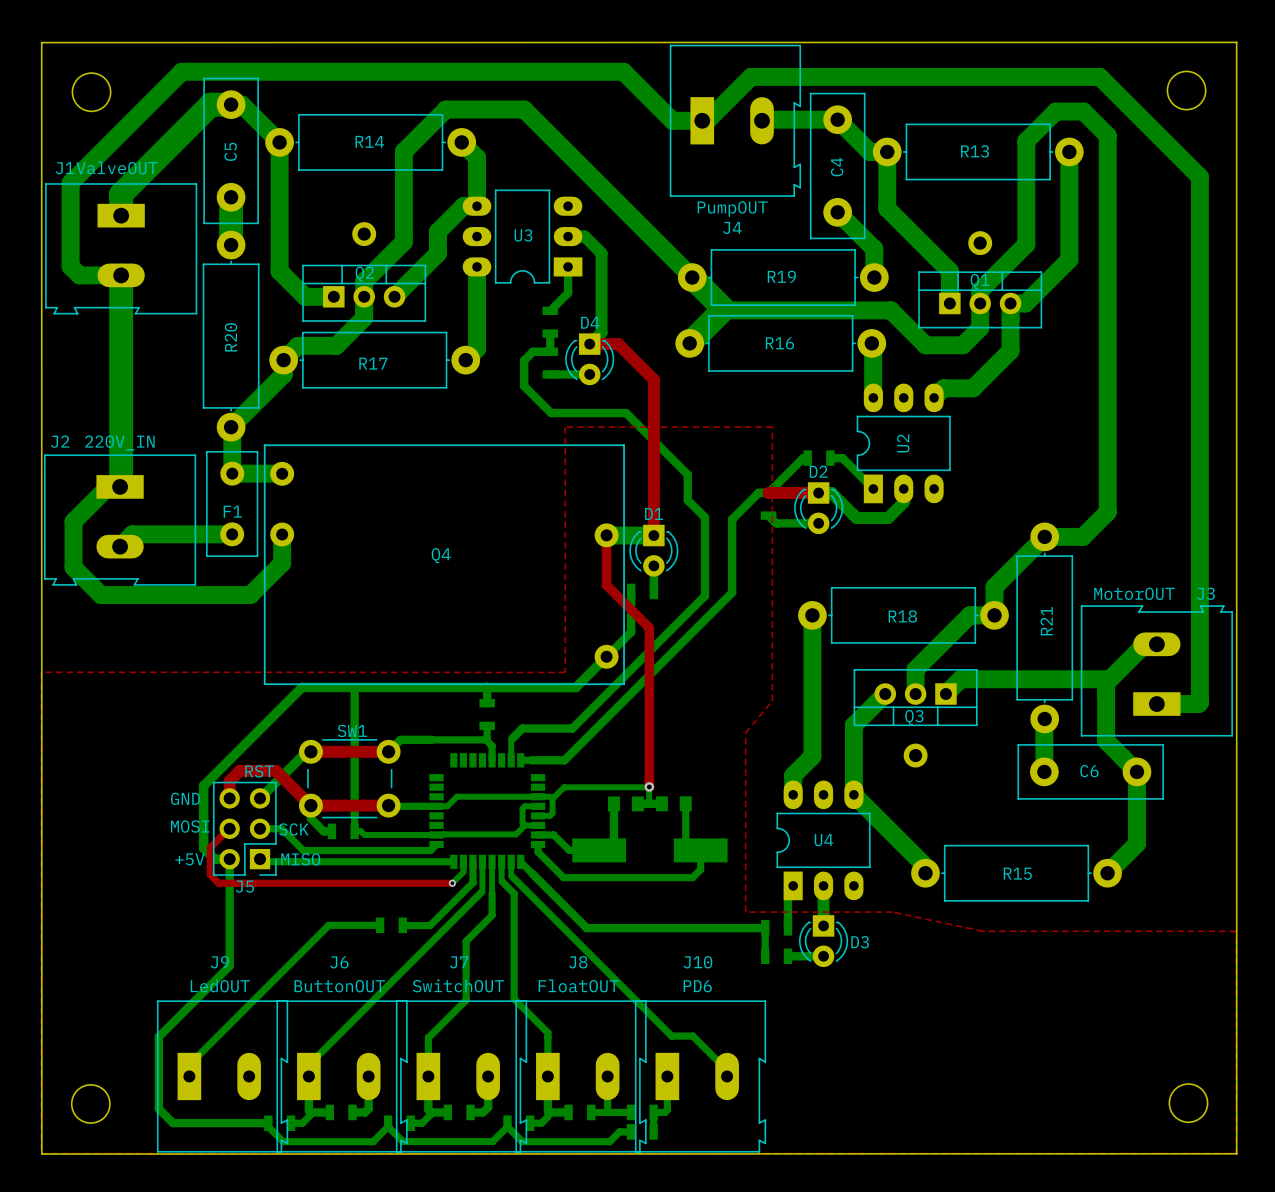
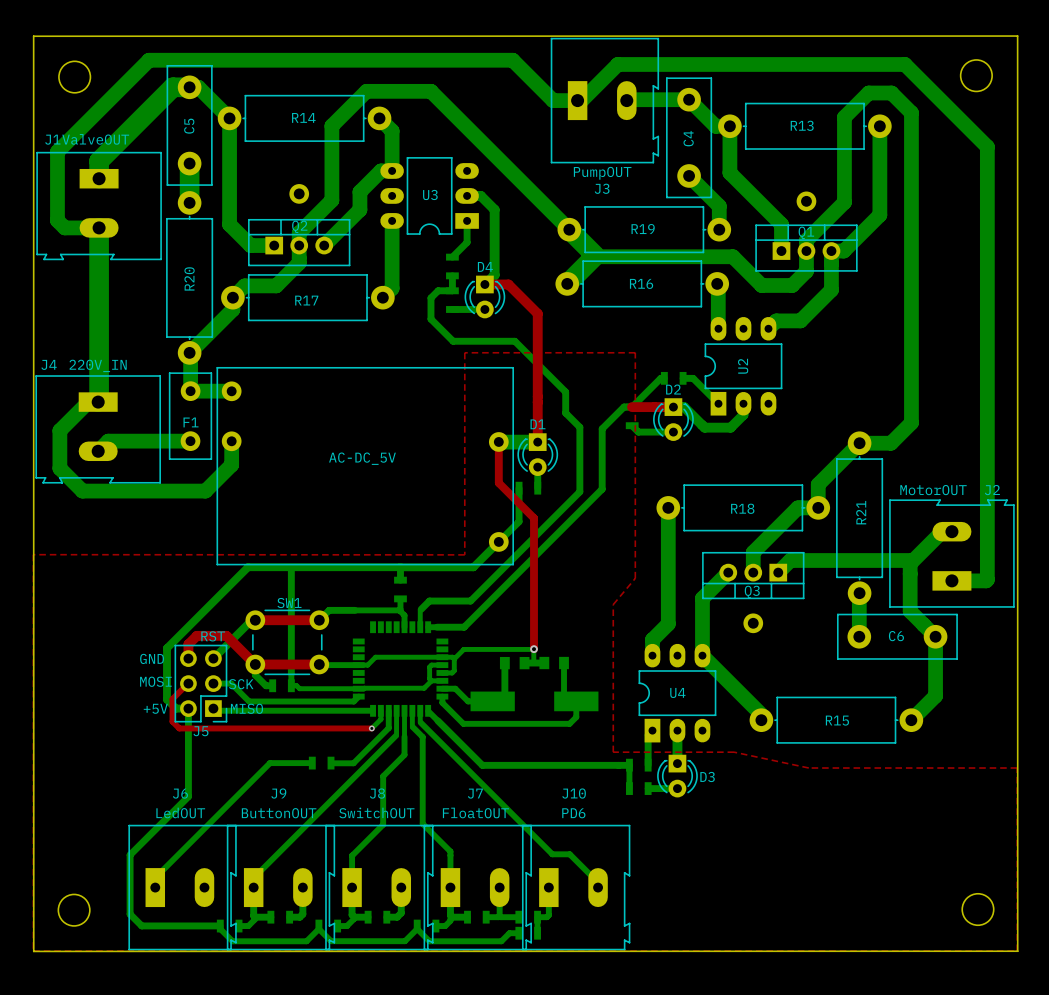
J4 name: J4 (732, 227) -> J3 (602, 188)
J2 name: J2 (60, 441) -> J4 (49, 364)
Q4 name: Q4 (441, 555) -> AC-DC_5V (362, 458)
J3 name: J3 (1205, 593) -> J2 (992, 490)
J9 name: J9 (219, 962) -> J6 (180, 793)
J6 name: J6 (339, 962) -> J9 (278, 793)
J7 name: J7 (459, 962) -> J8 (377, 793)
J8 name: J8 (578, 962) -> J7 (475, 793)

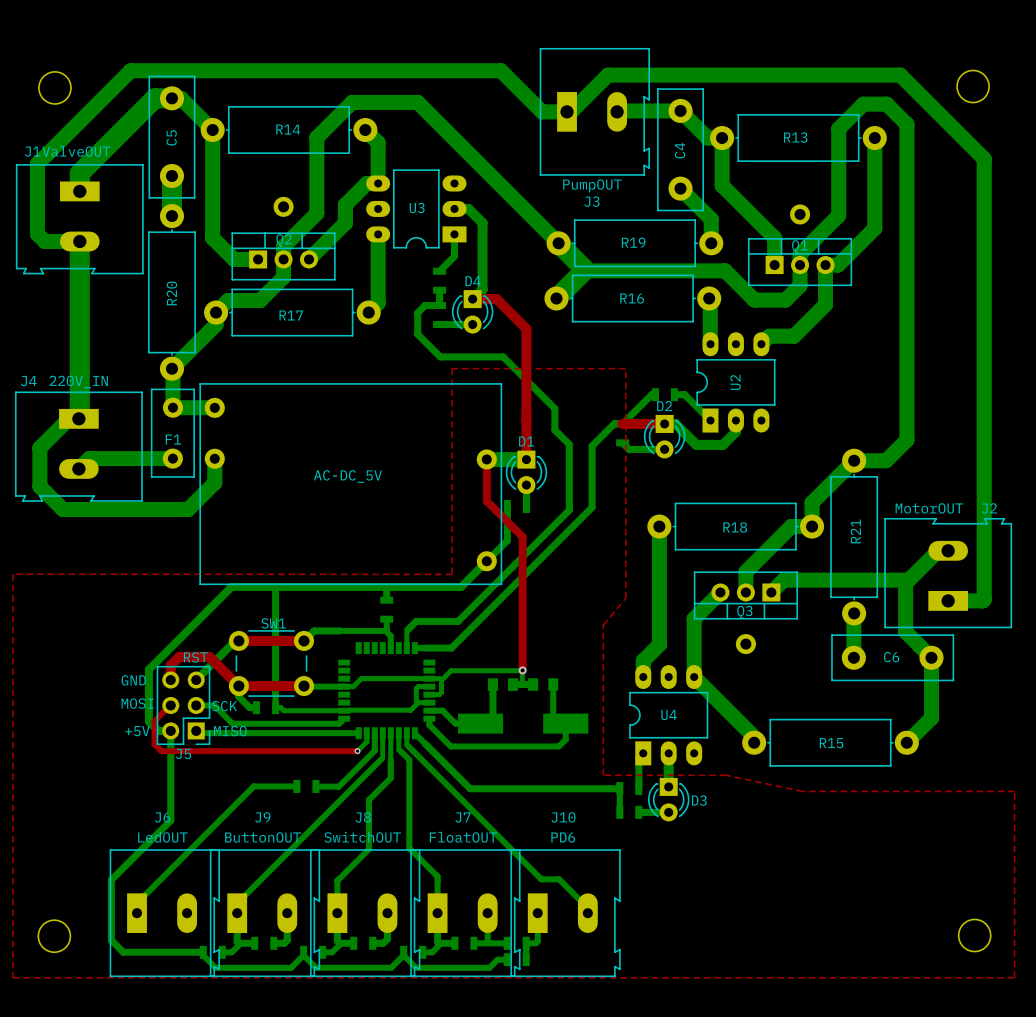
board edge: (1017, 36) (1017, 951) (33, 951) (33, 36) (1017, 36) -> none

